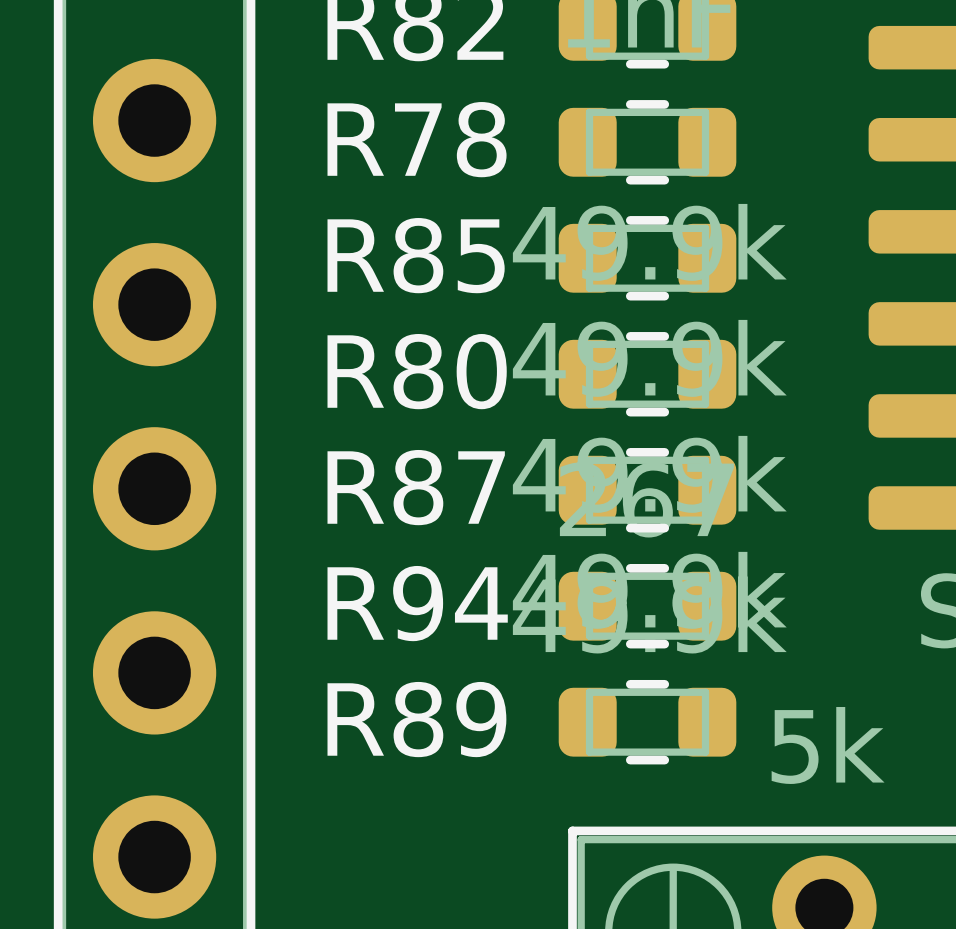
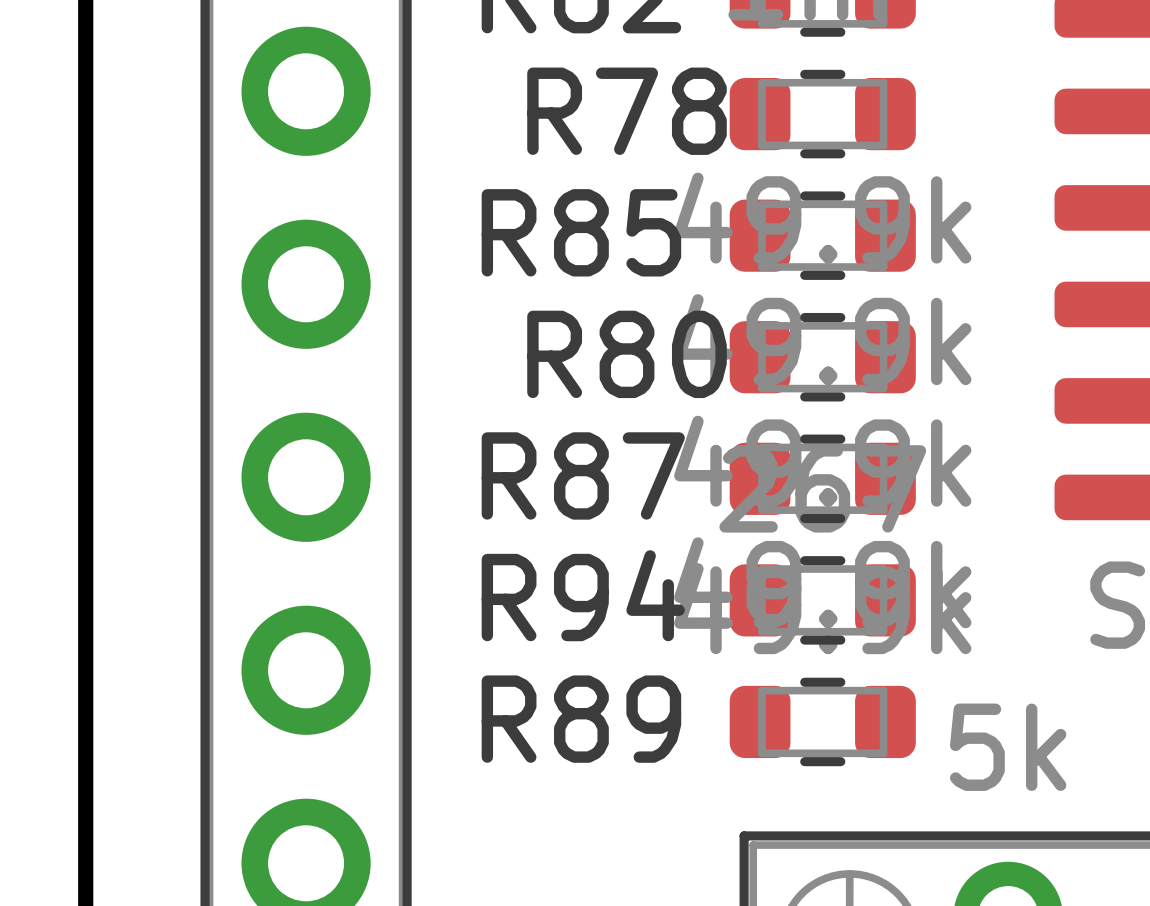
R78 name position: R78 (417, 139) -> R78 (627, 111)
R80 name position: R80 (417, 371) -> R80 (627, 354)

